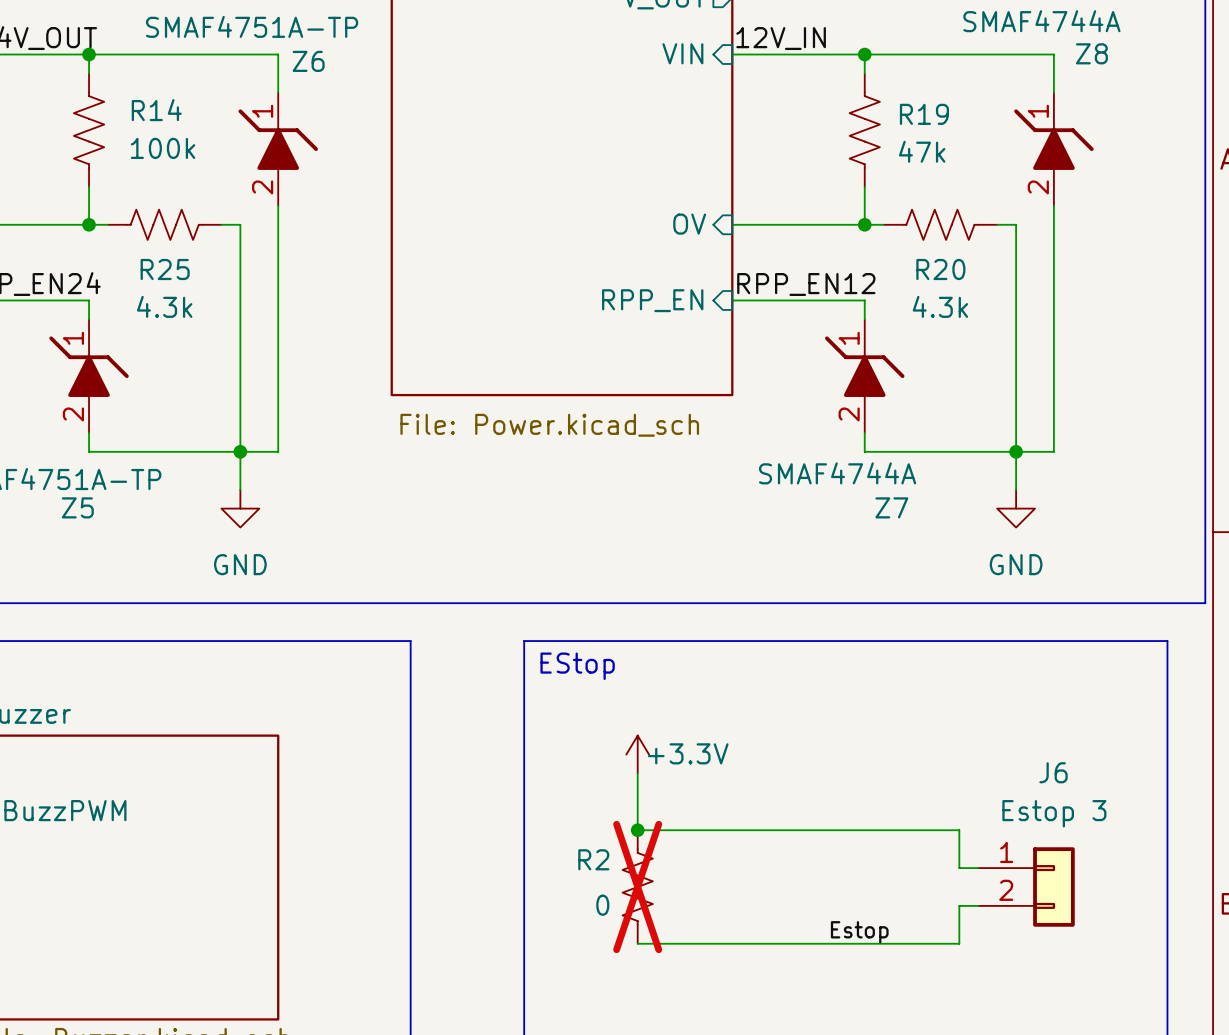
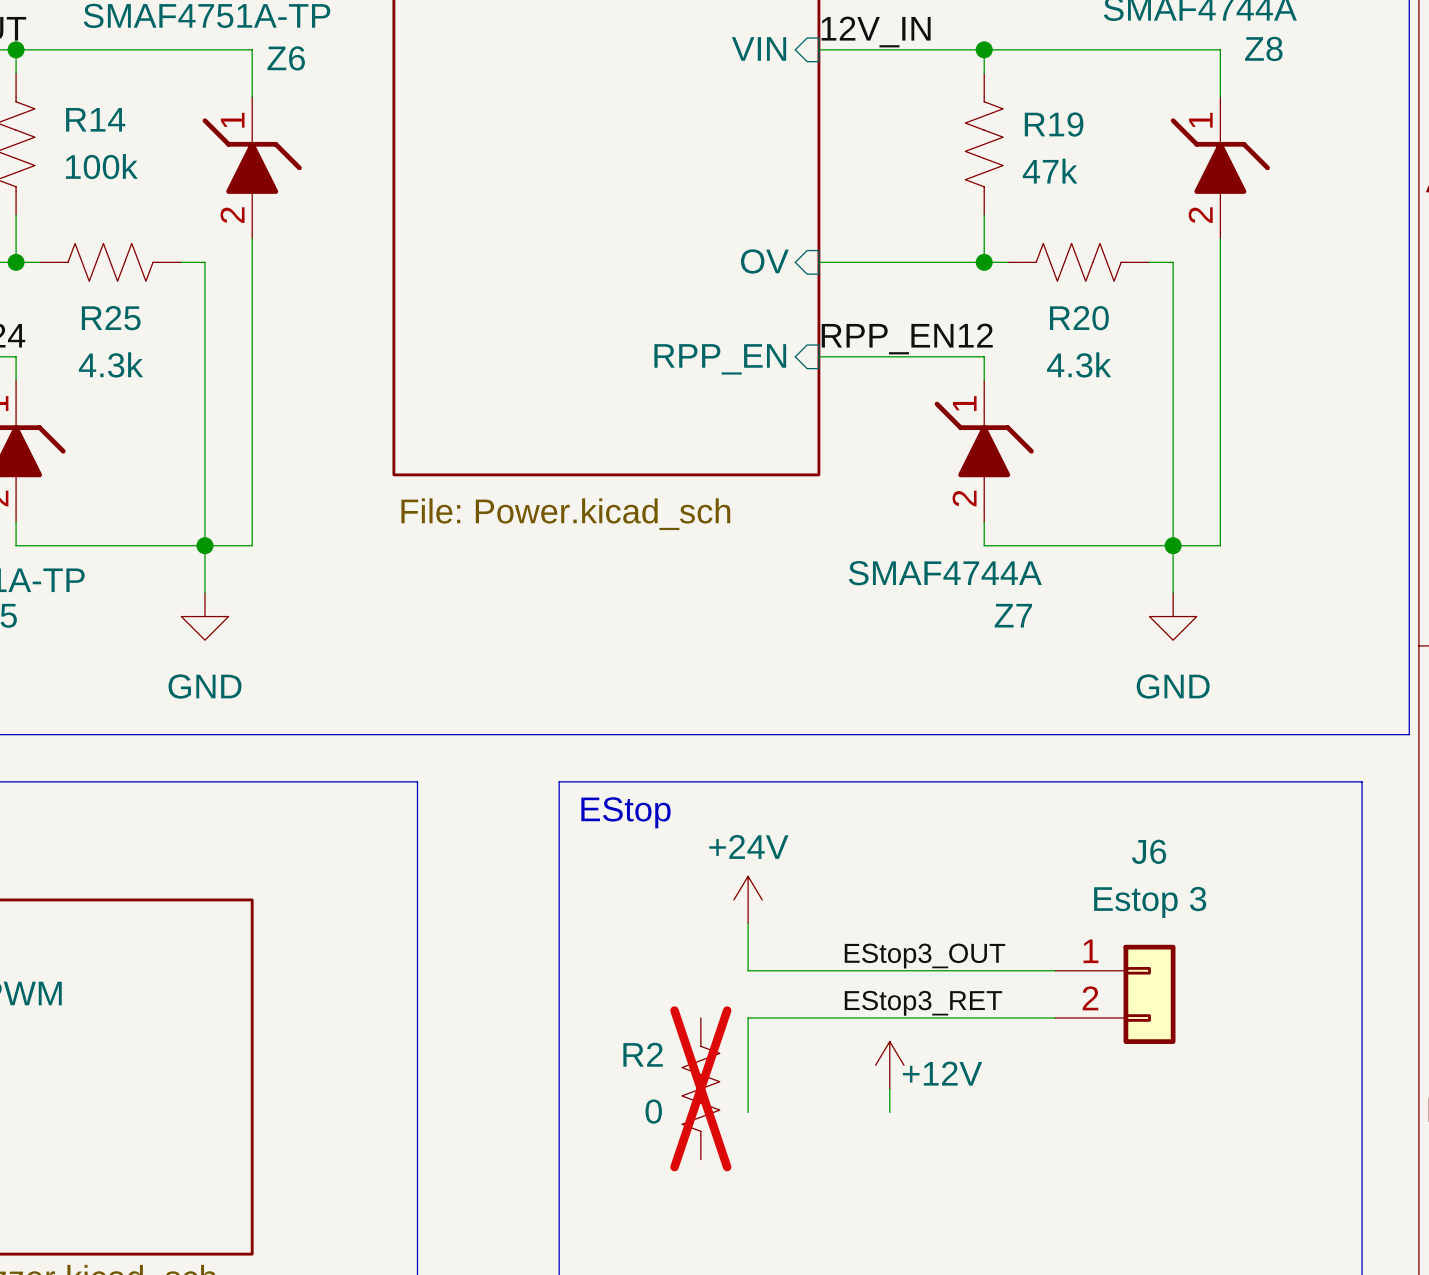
power symbol: none -> +24V (748, 899)
power symbol: +3.3V (637, 754) -> none
wire: none -> (748, 923) (748, 970) (1055, 970)
wire: (637, 773) (637, 830) (675, 830) -> (748, 1112) (748, 1017)
label: none -> EStop3_OUT (925, 956)
label: none -> EStop3_RET (923, 1003)
junction: (637, 830) -> none
wire: (921, 830) (959, 830) (959, 868) (978, 868) -> none
power symbol: none -> +12V (889, 1065)
wire: none -> (889, 1088) (889, 1112)
J6 position: (1026, 886) -> (1115, 994)
wire: (978, 905) (959, 905) (959, 943) (637, 943) -> none
label: Estop (859, 932) -> none

